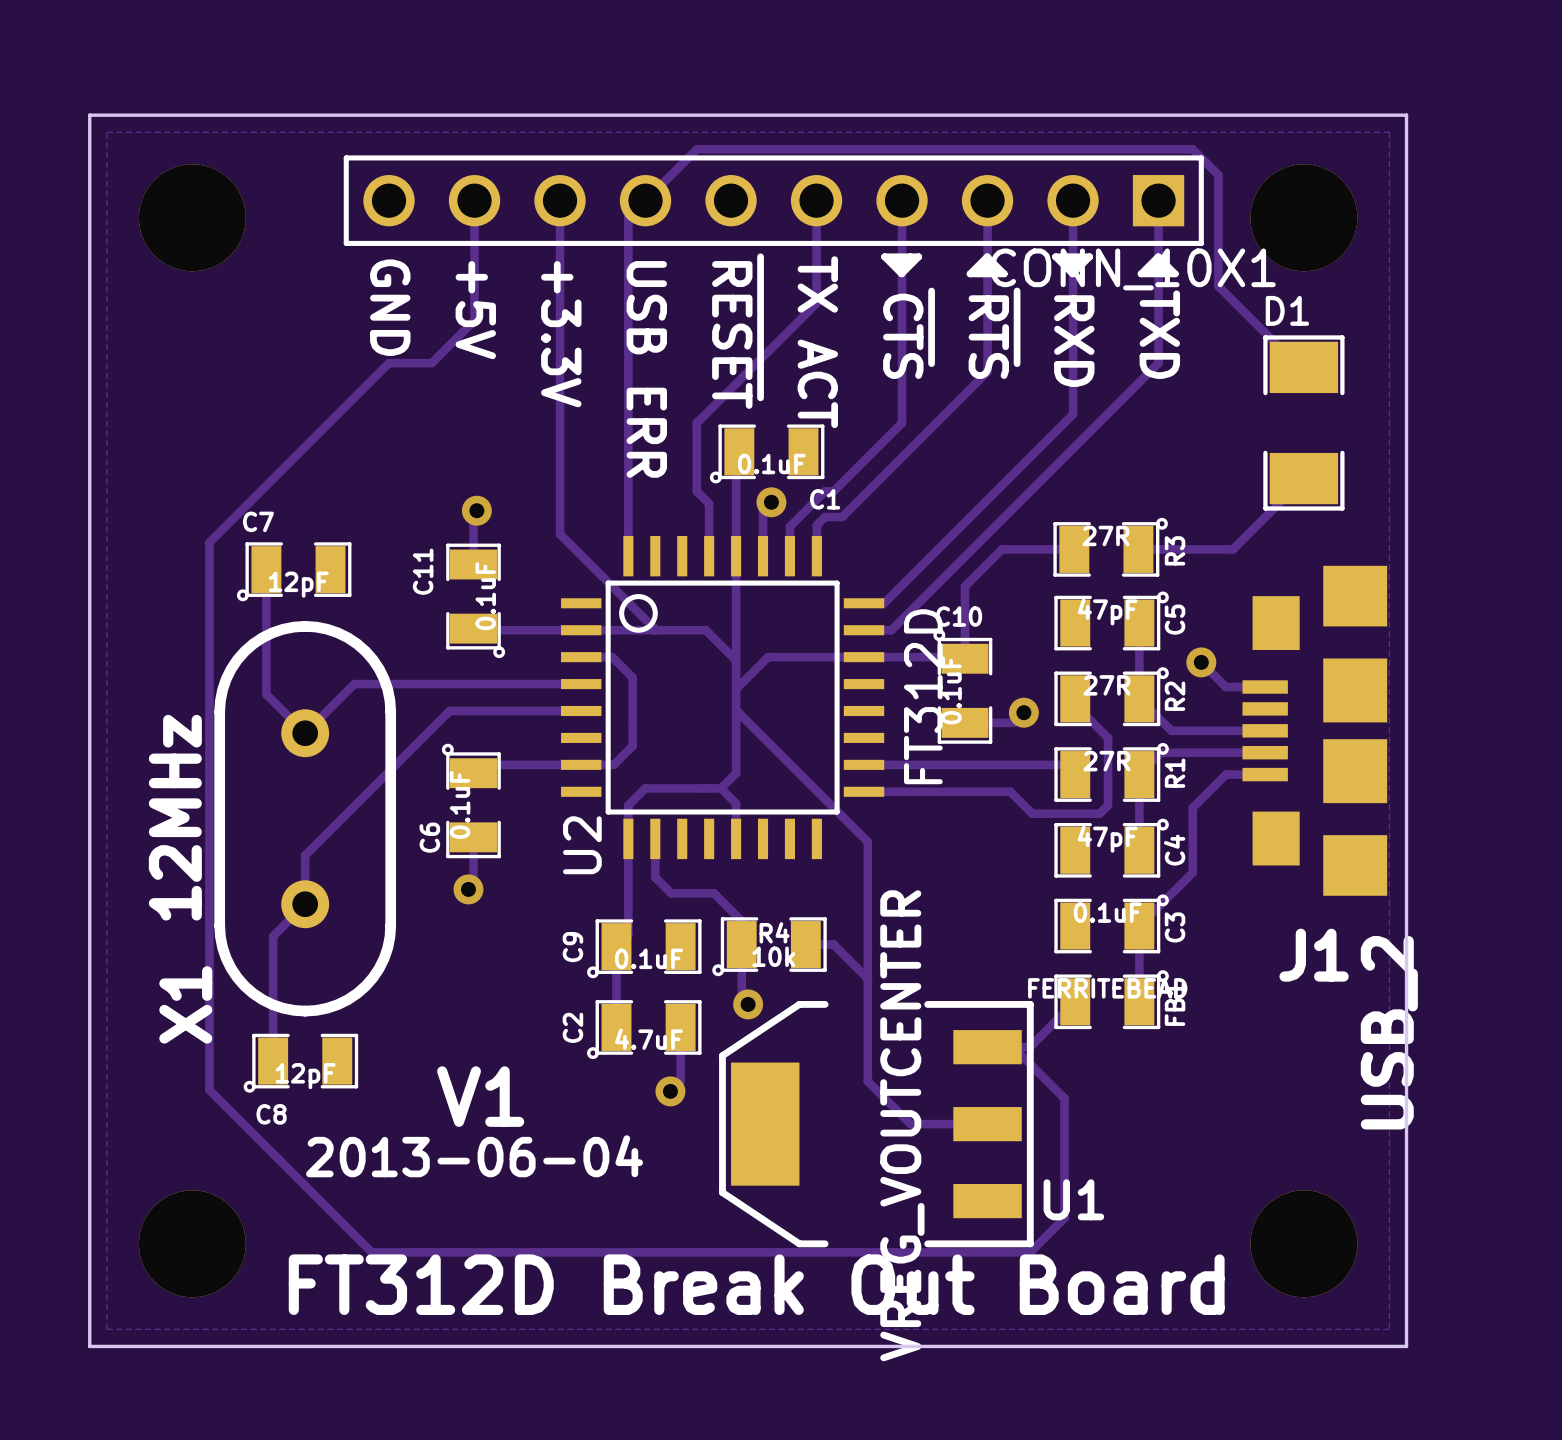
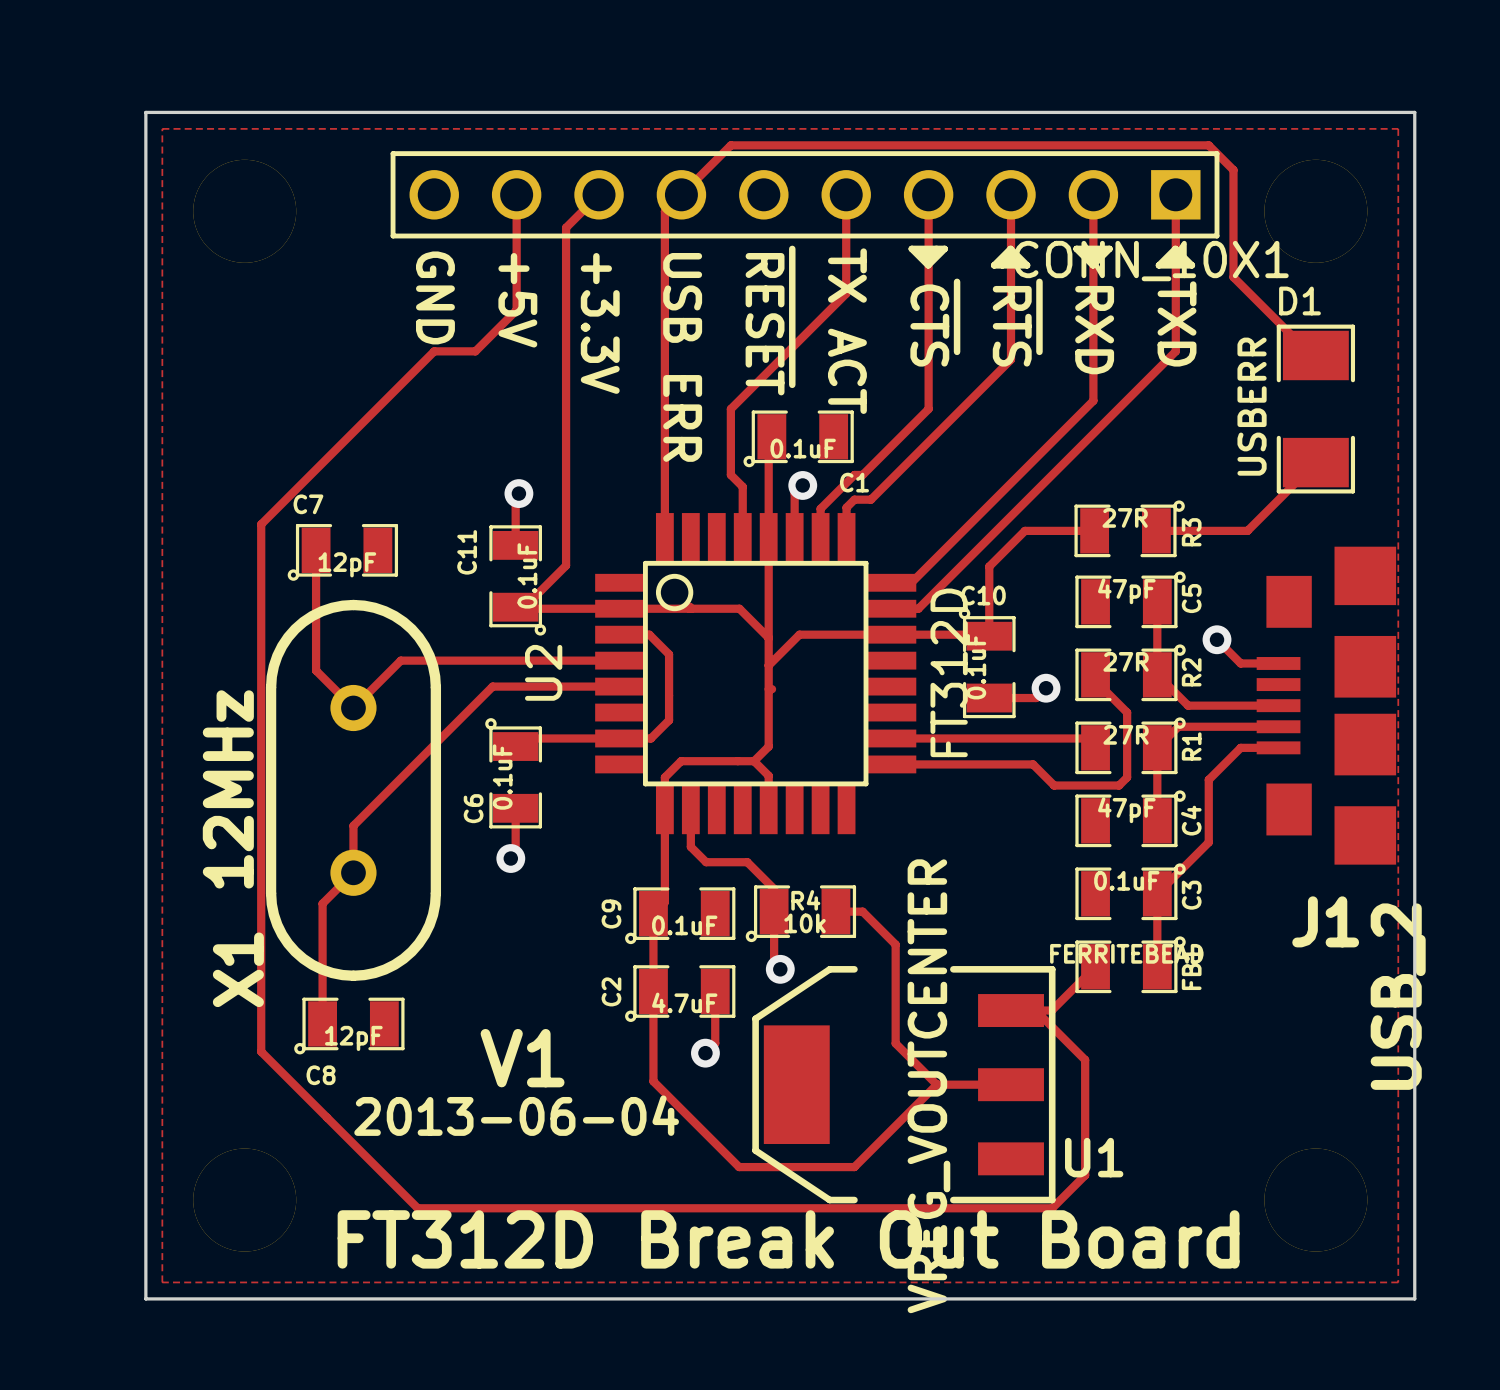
track: (560, 200) (560, 534) (654, 628) -> (599, 194) (566, 227) (566, 565) (524, 607) (515, 607)
text: none -> USBERR (1252, 406)
U2 footprint: [561, 535, 885, 860] -> [595, 513, 917, 835]
track: (736, 710) (867, 841) (867, 978) -> none
U2 name position: U2 (582, 845) -> U2 (543, 672)
track: none -> (653, 991) (653, 1081) (739, 1167) (854, 1167) (936, 1084)

